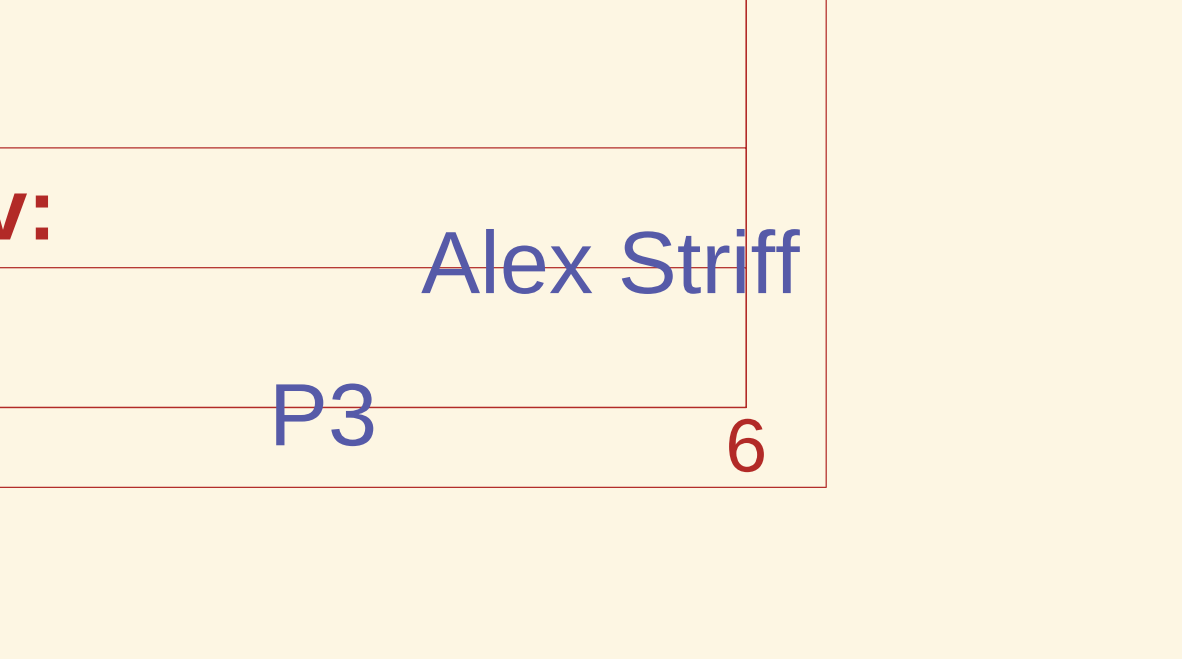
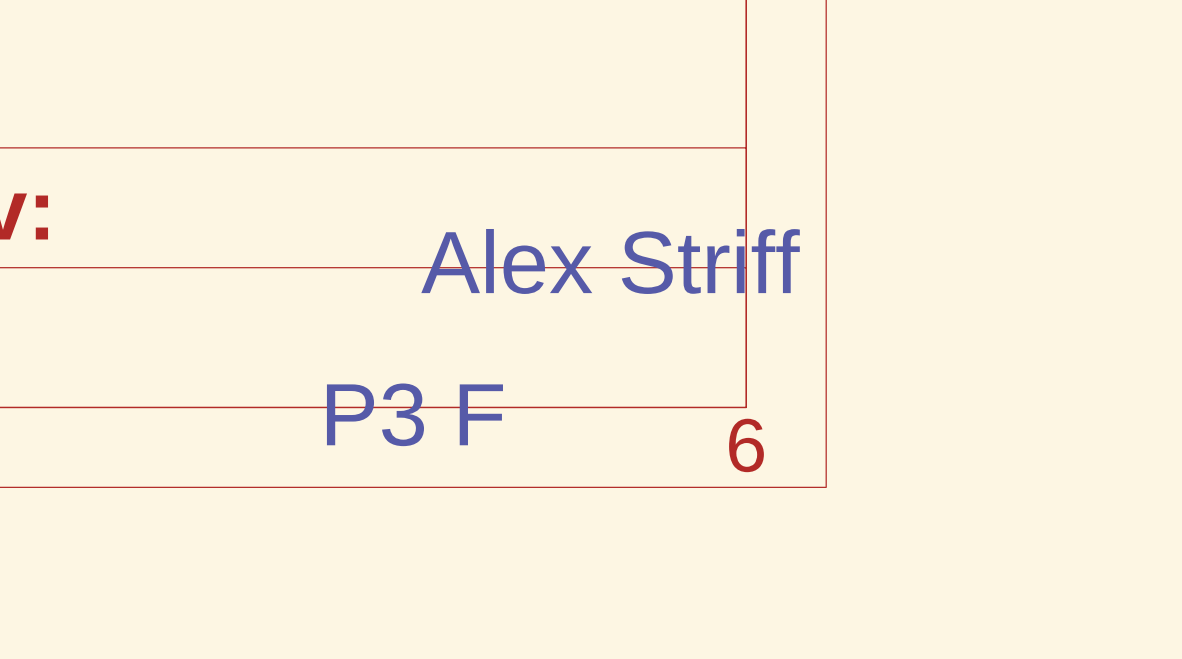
text: P3 (324, 414) -> P3 F (414, 414)

